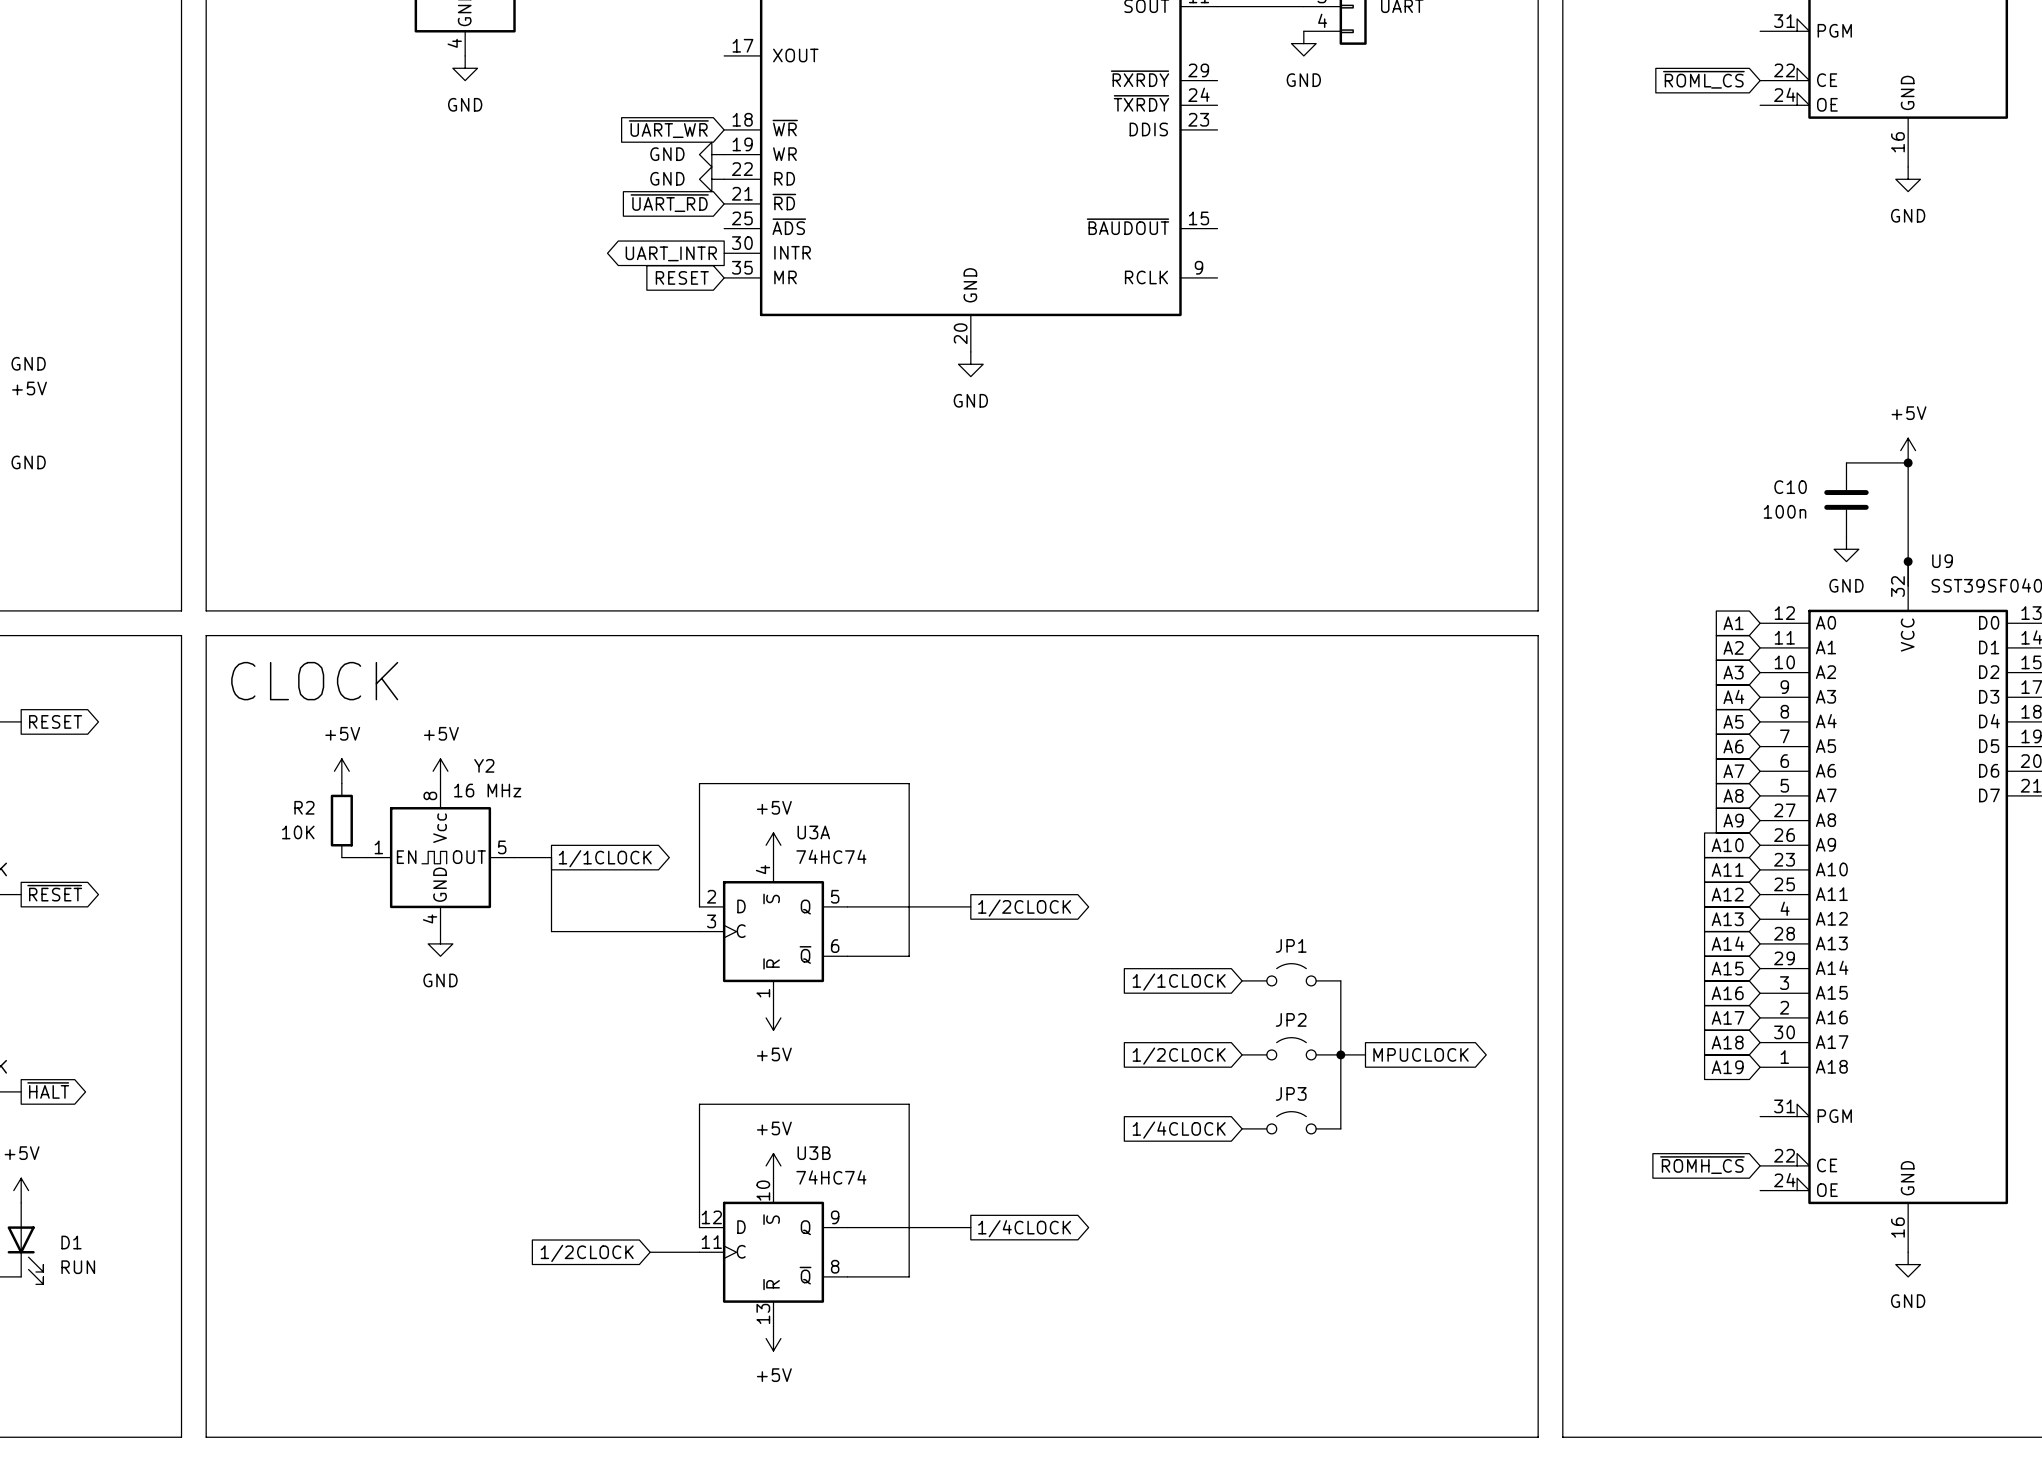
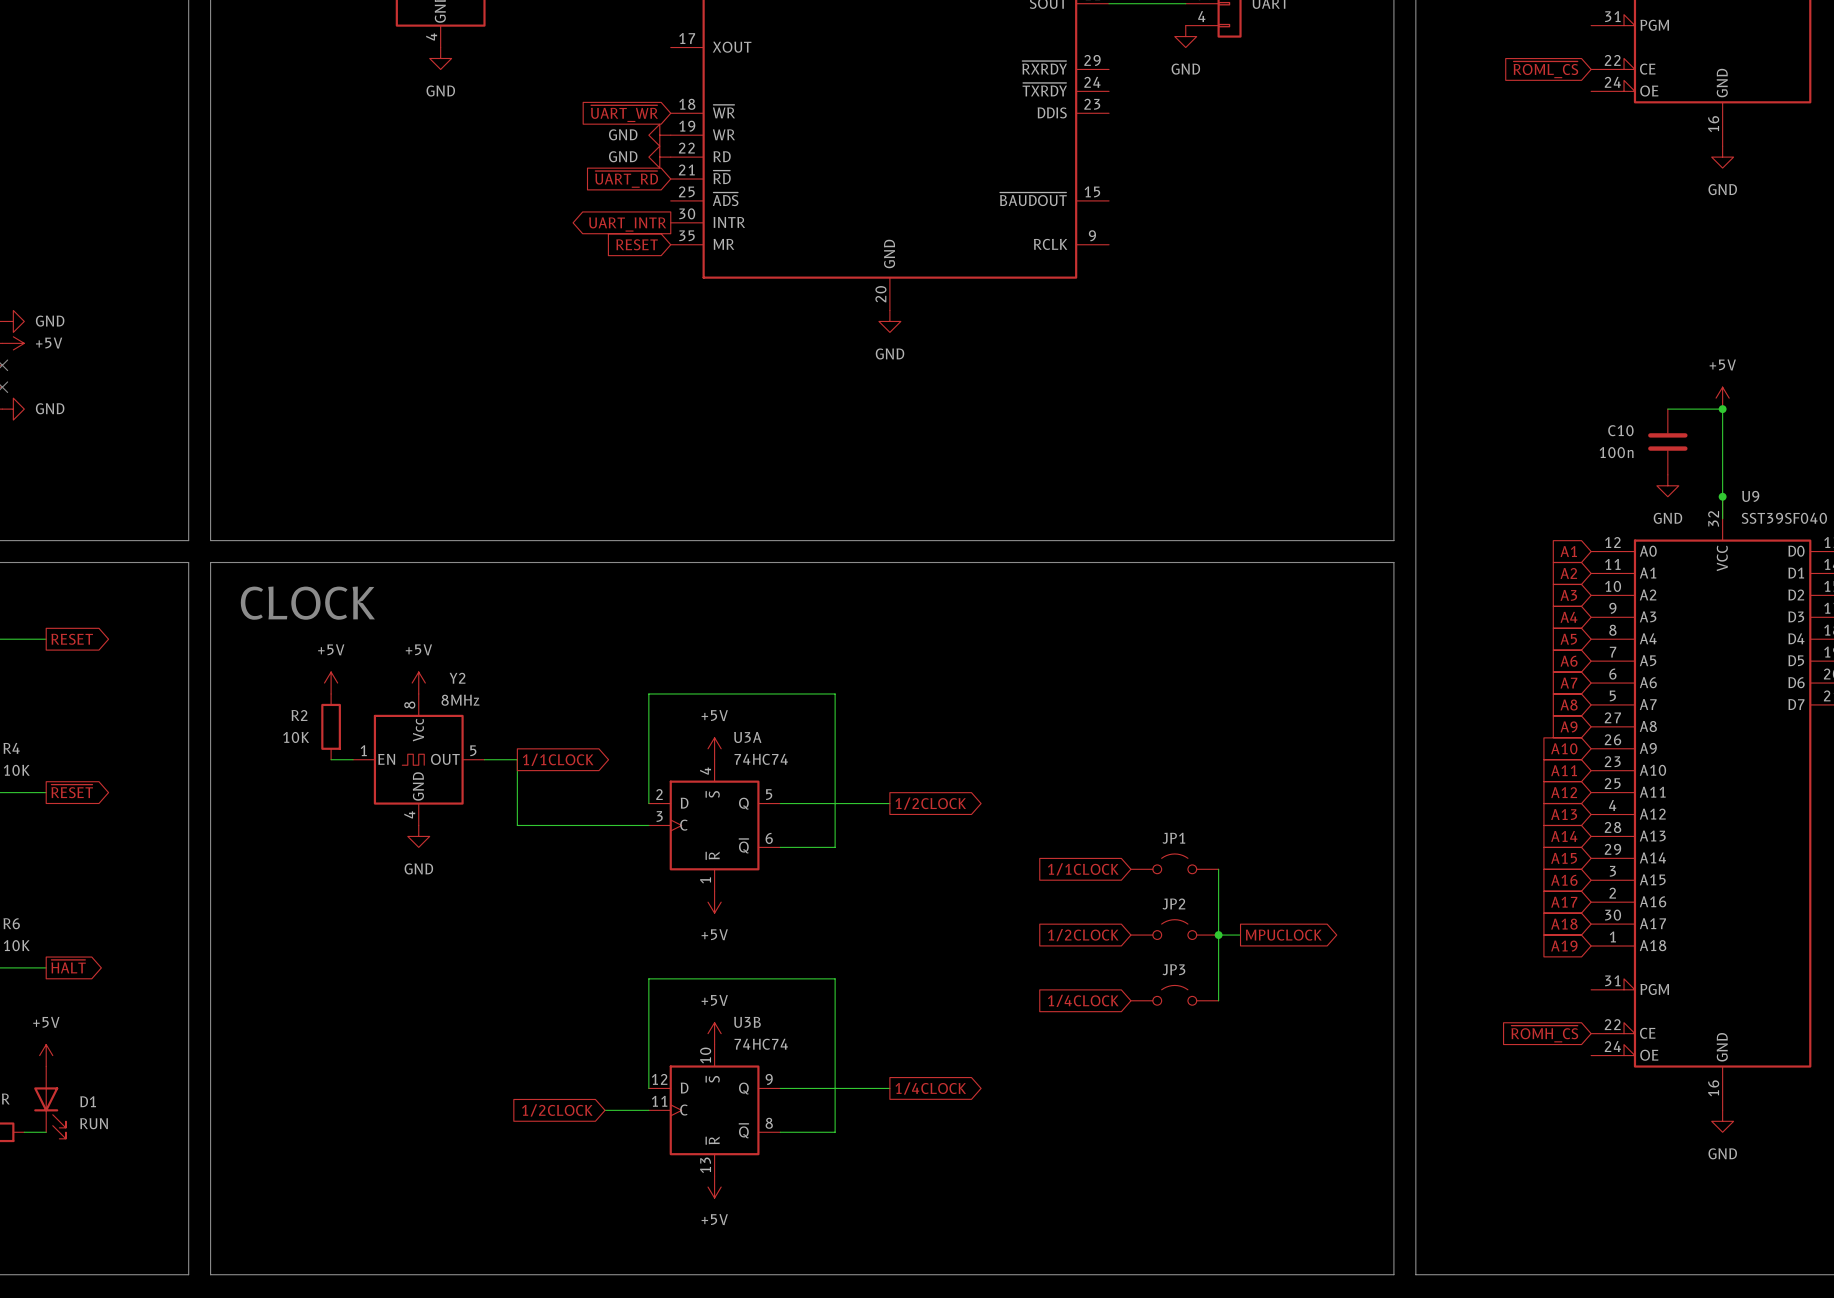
Y2 value: 16 MHz (487, 790) -> 8MHz (460, 700)

